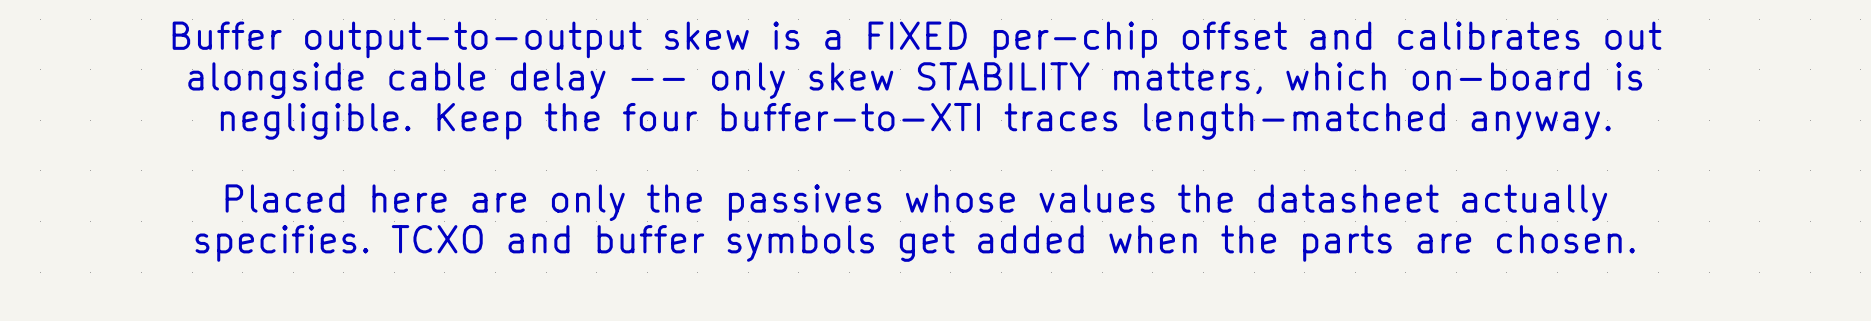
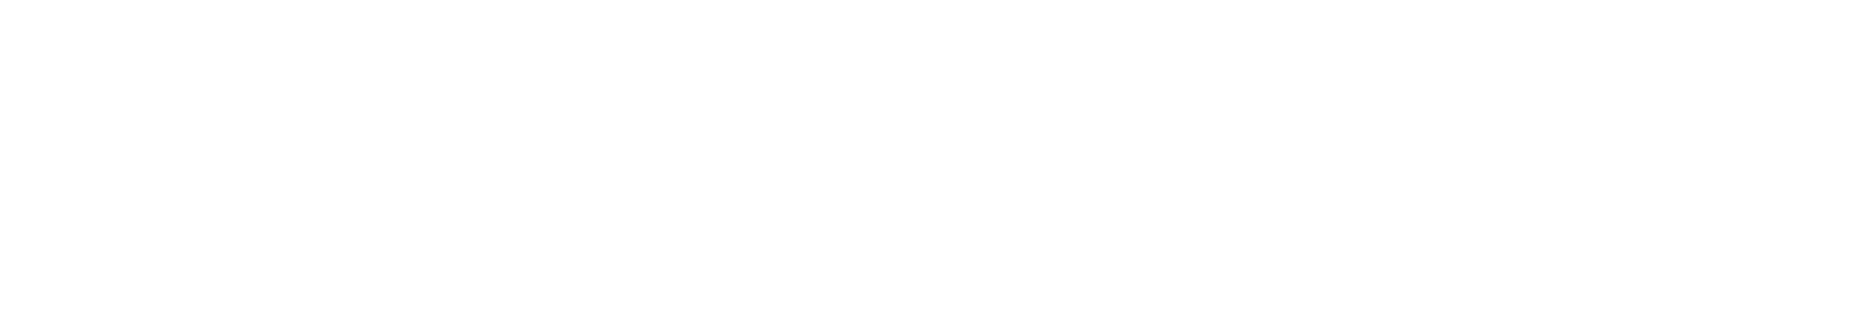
text: Buffer output-to-output skew is a FIXED per-chip offset and calibrates out (917, 39) -> none
text: alongside cable delay -- only skew STABILITY matters, which on-board is (915, 80) -> none
text: negligible. Keep the four buffer-to-XTI traces length-matched anyway. (915, 121) -> none
text: Placed here are only the passives whose values the datasheet actually (916, 202) -> none
text: specifies. TCXO and buffer symbols get added when the parts are chosen. (915, 243) -> none

